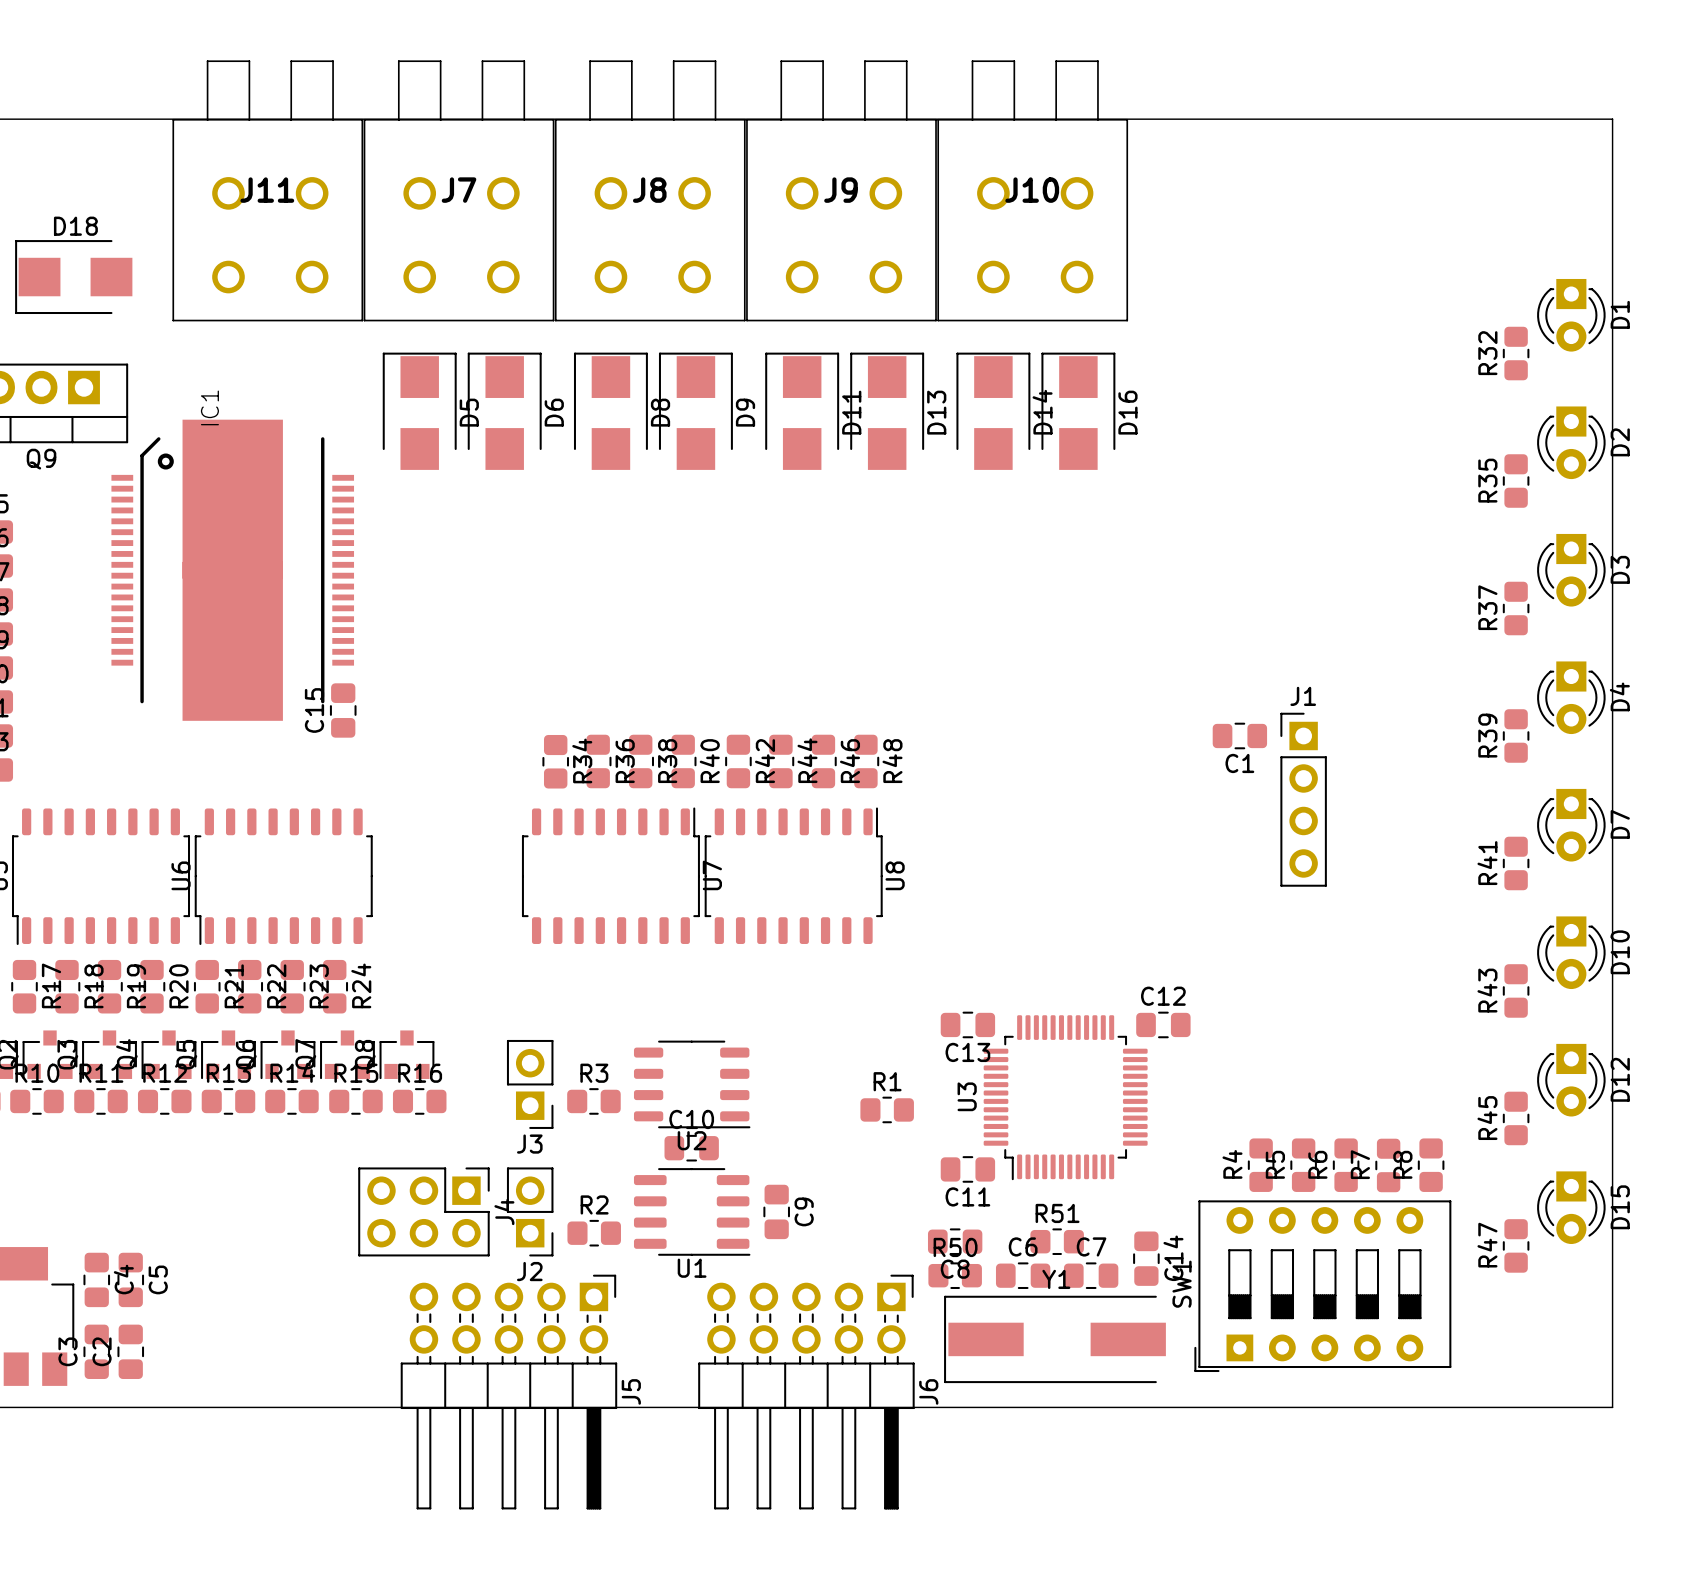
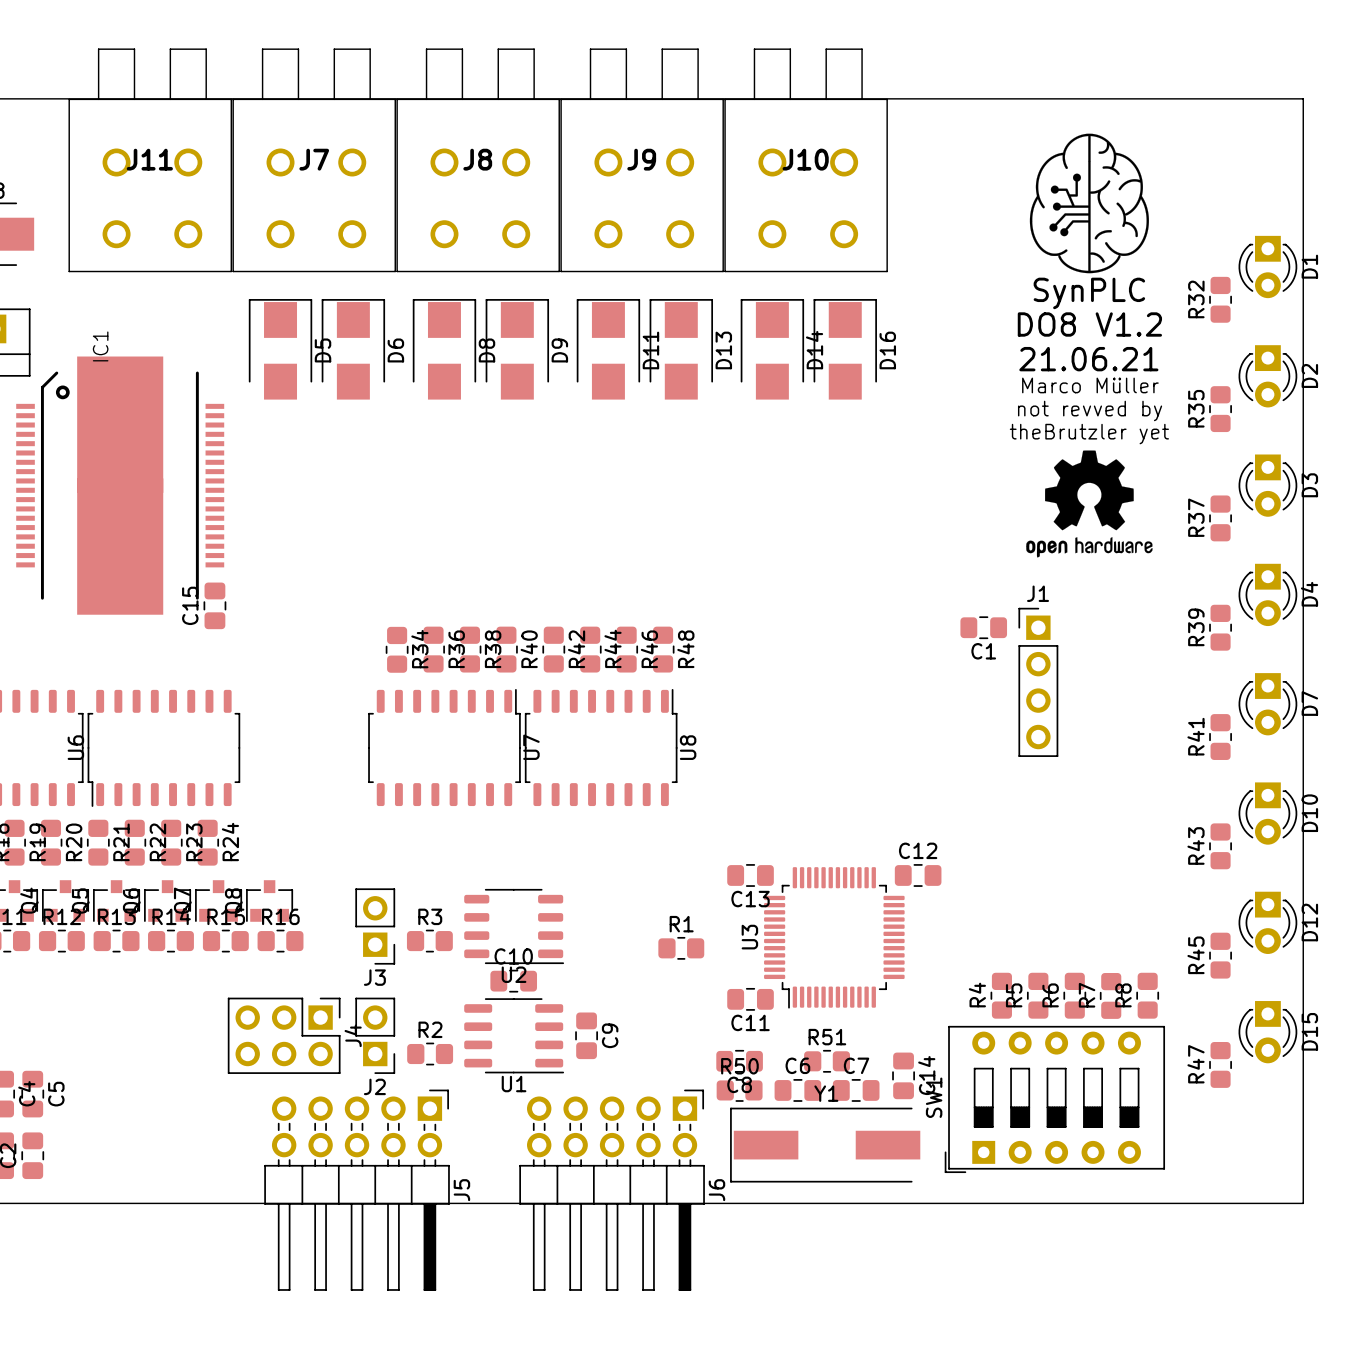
drawing: none -> [1029, 133, 1149, 274]
text: none -> SynPLC (1089, 293)
text: none -> DO8 V1.2 (1089, 324)
text: none -> 21.06.21 (1088, 359)
text: none -> Marco Müller (1090, 385)
text: none -> not revved by (1090, 410)
text: none -> theBrutzler yet (1089, 434)
drawing: none -> [1026, 450, 1153, 558]

